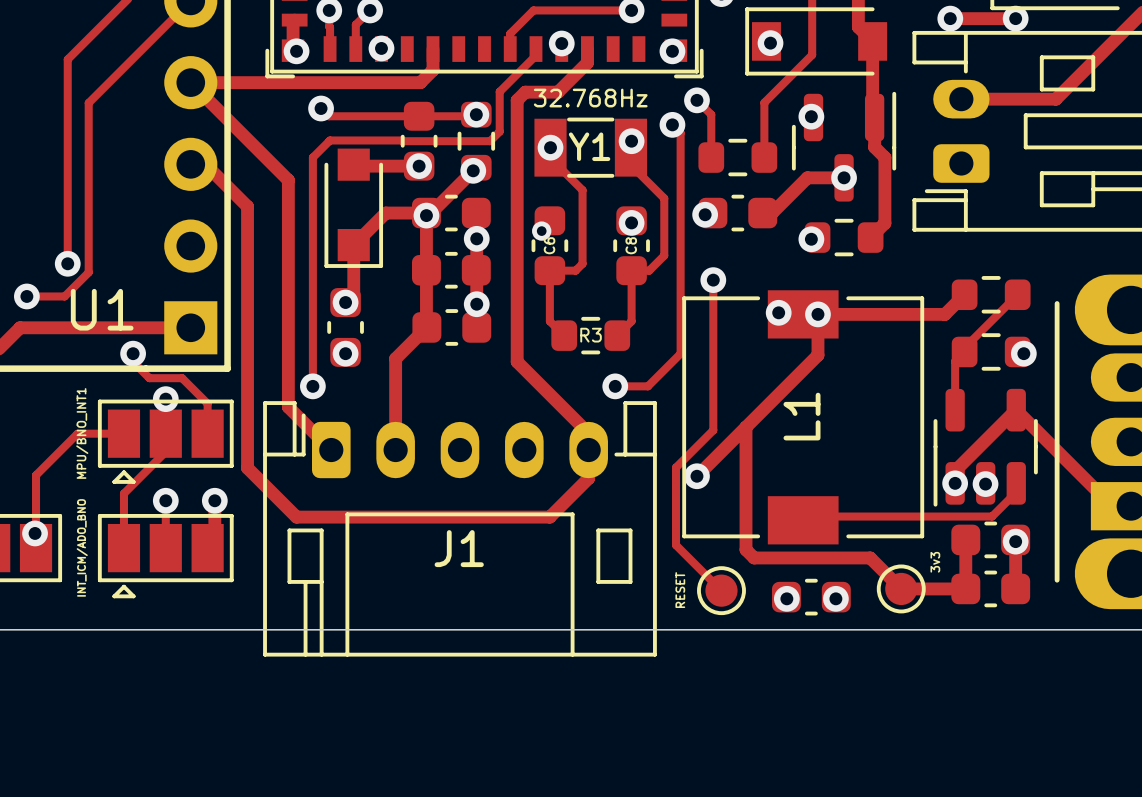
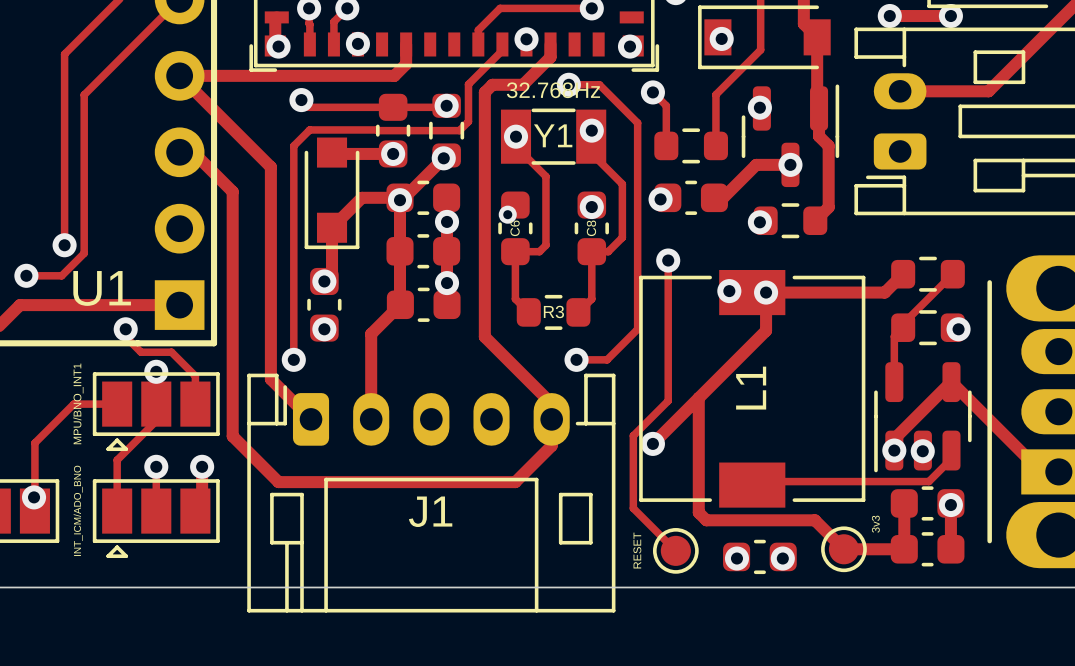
track: none -> (568, 84) (599, 84) (630, 115)
via position: (672, 124) -> (568, 84)

